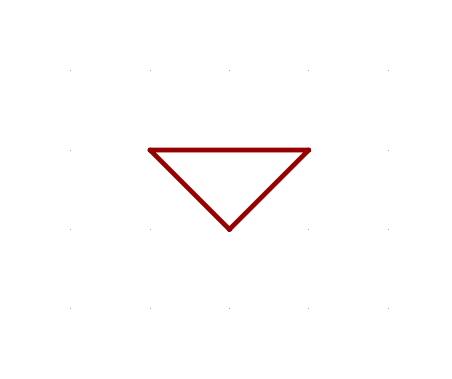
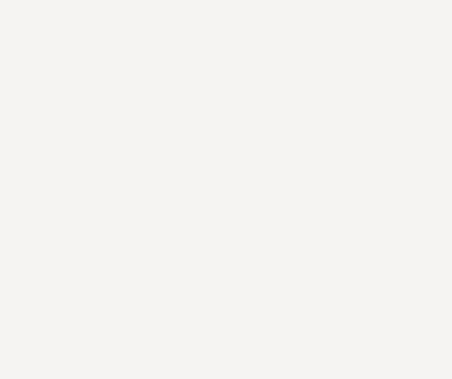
power symbol: (229, 189) -> none

